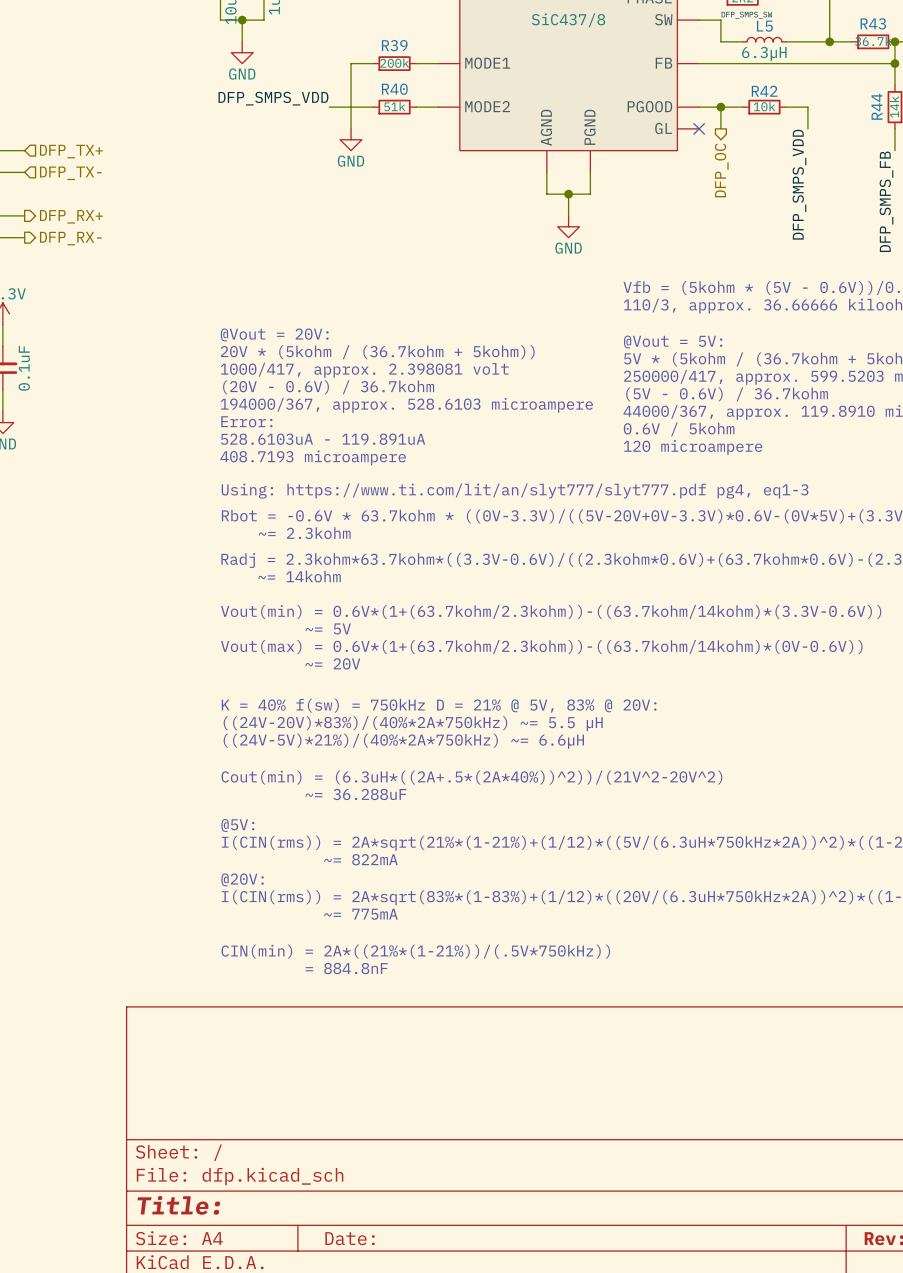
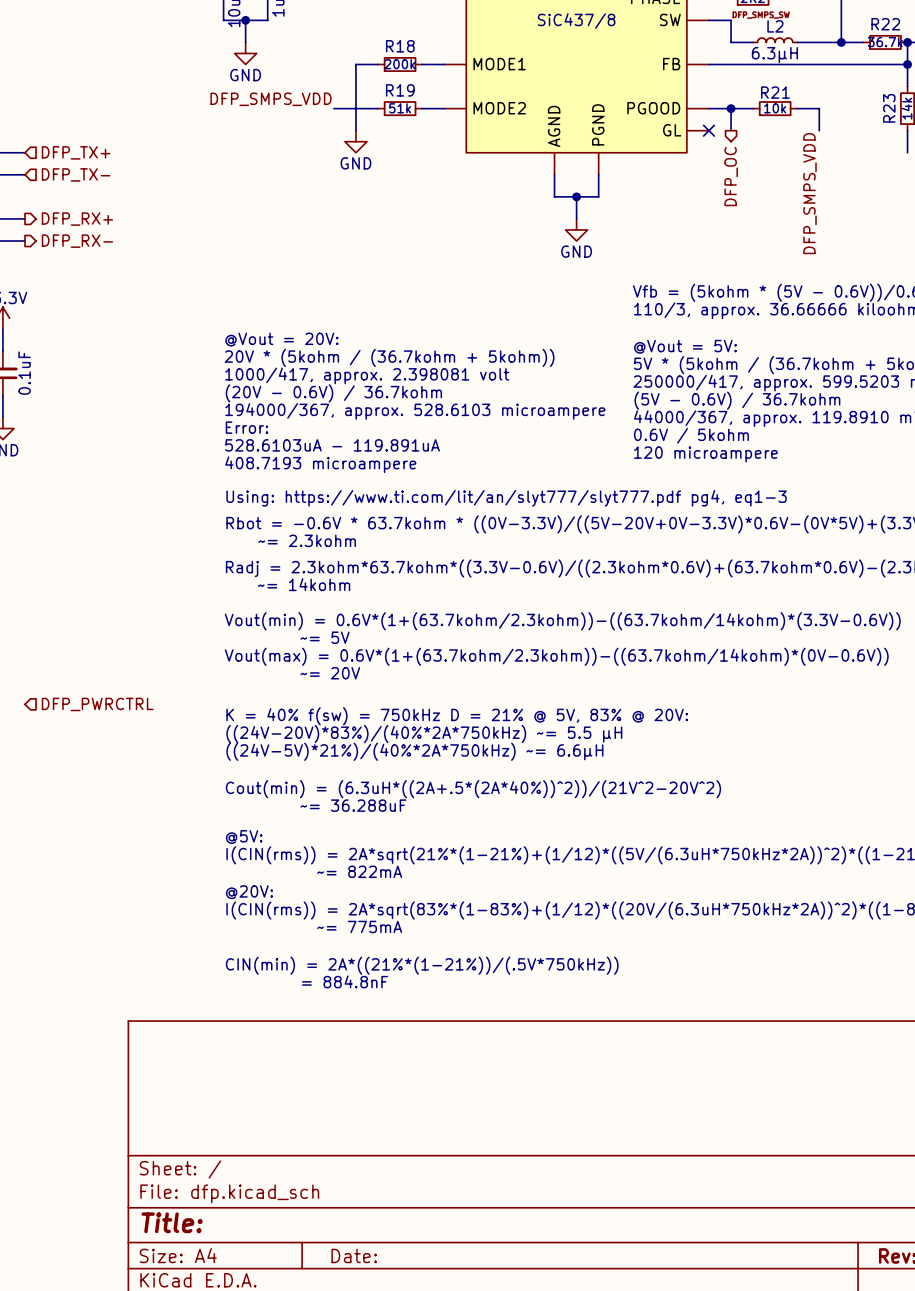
R43 name: R43 (873, 23) -> R22 (885, 24)
L5 name: L5 (764, 26) -> L2 (775, 26)
R39 name: R39 (394, 45) -> R18 (400, 46)
R40 name: R40 (394, 89) -> R19 (400, 90)
R42 name: R42 (764, 91) -> R21 (775, 92)
R44 name: R44 (877, 106) -> R23 (889, 108)
label: DFP_SMPS_FB (886, 201) -> none
hierarchical label: none -> DFP_PWRCTRL (97, 704)

